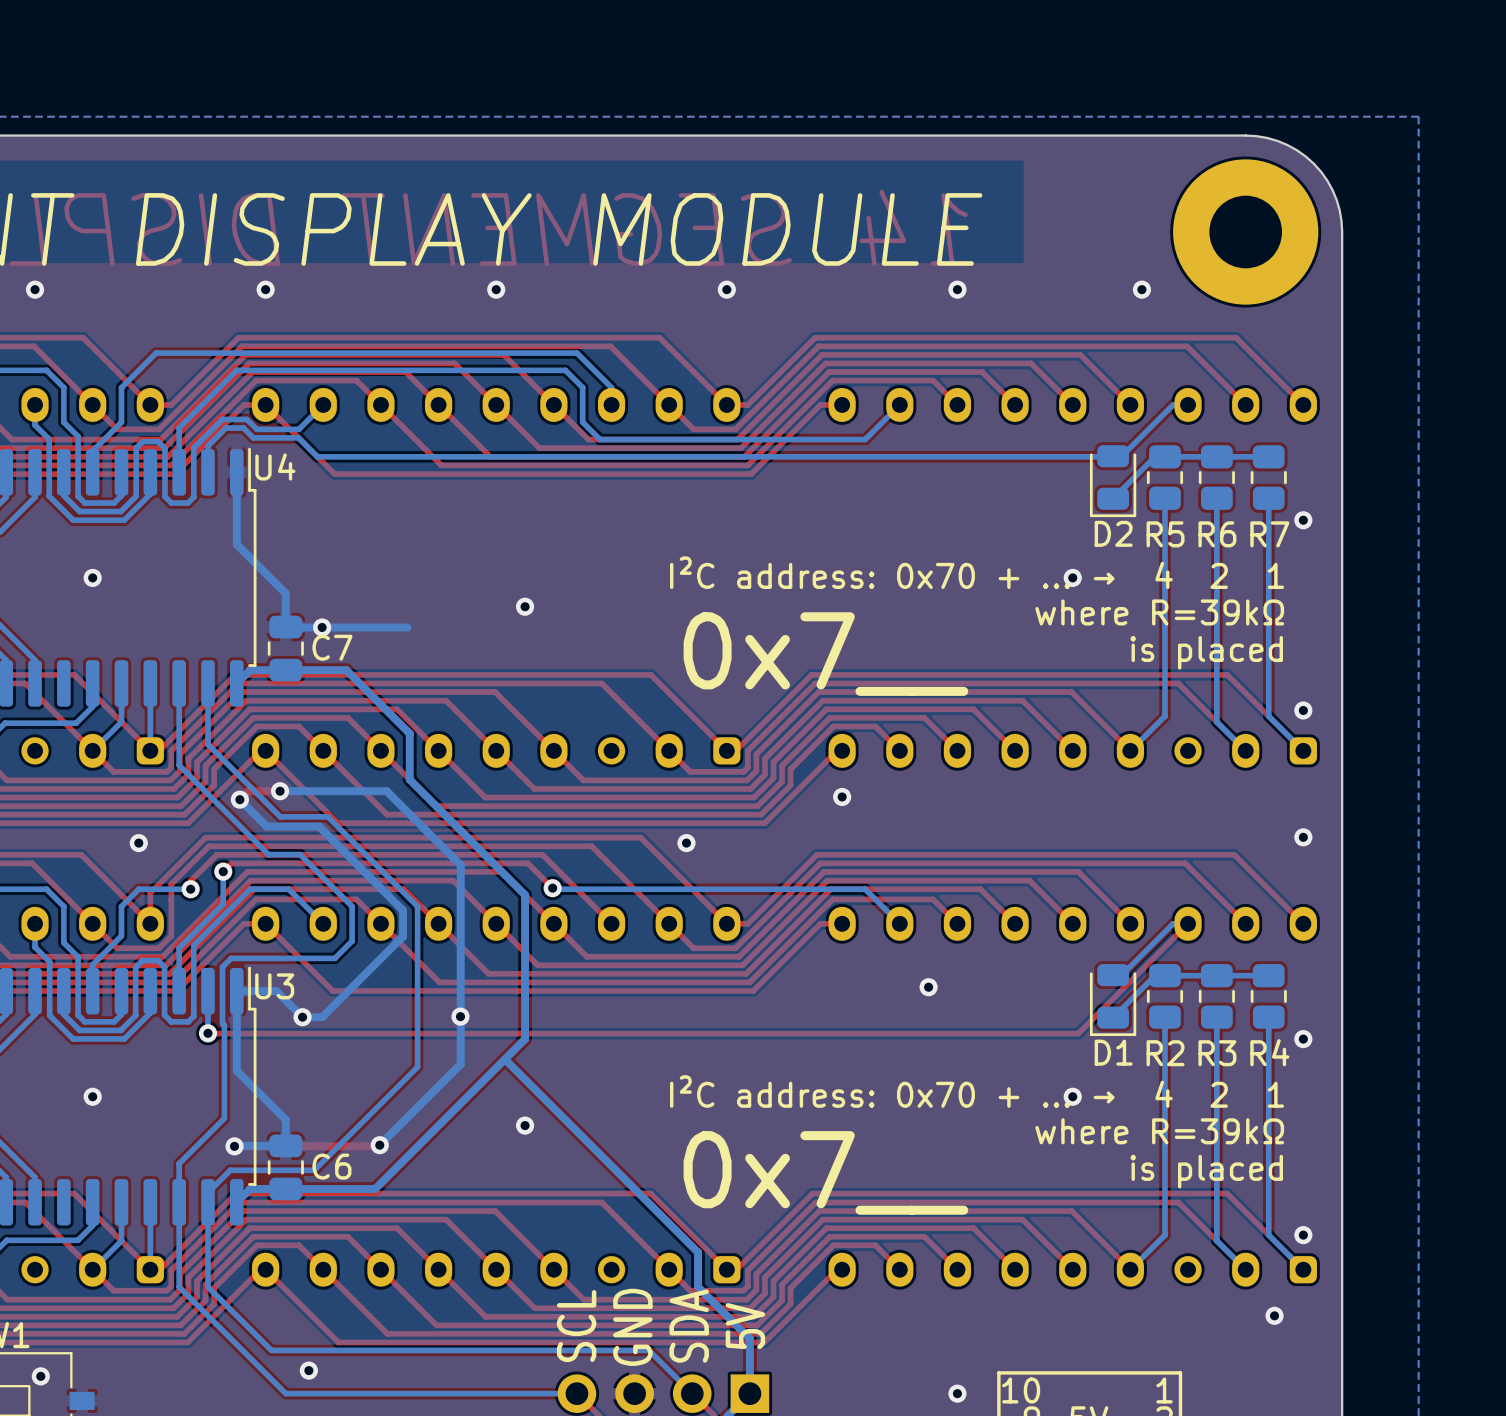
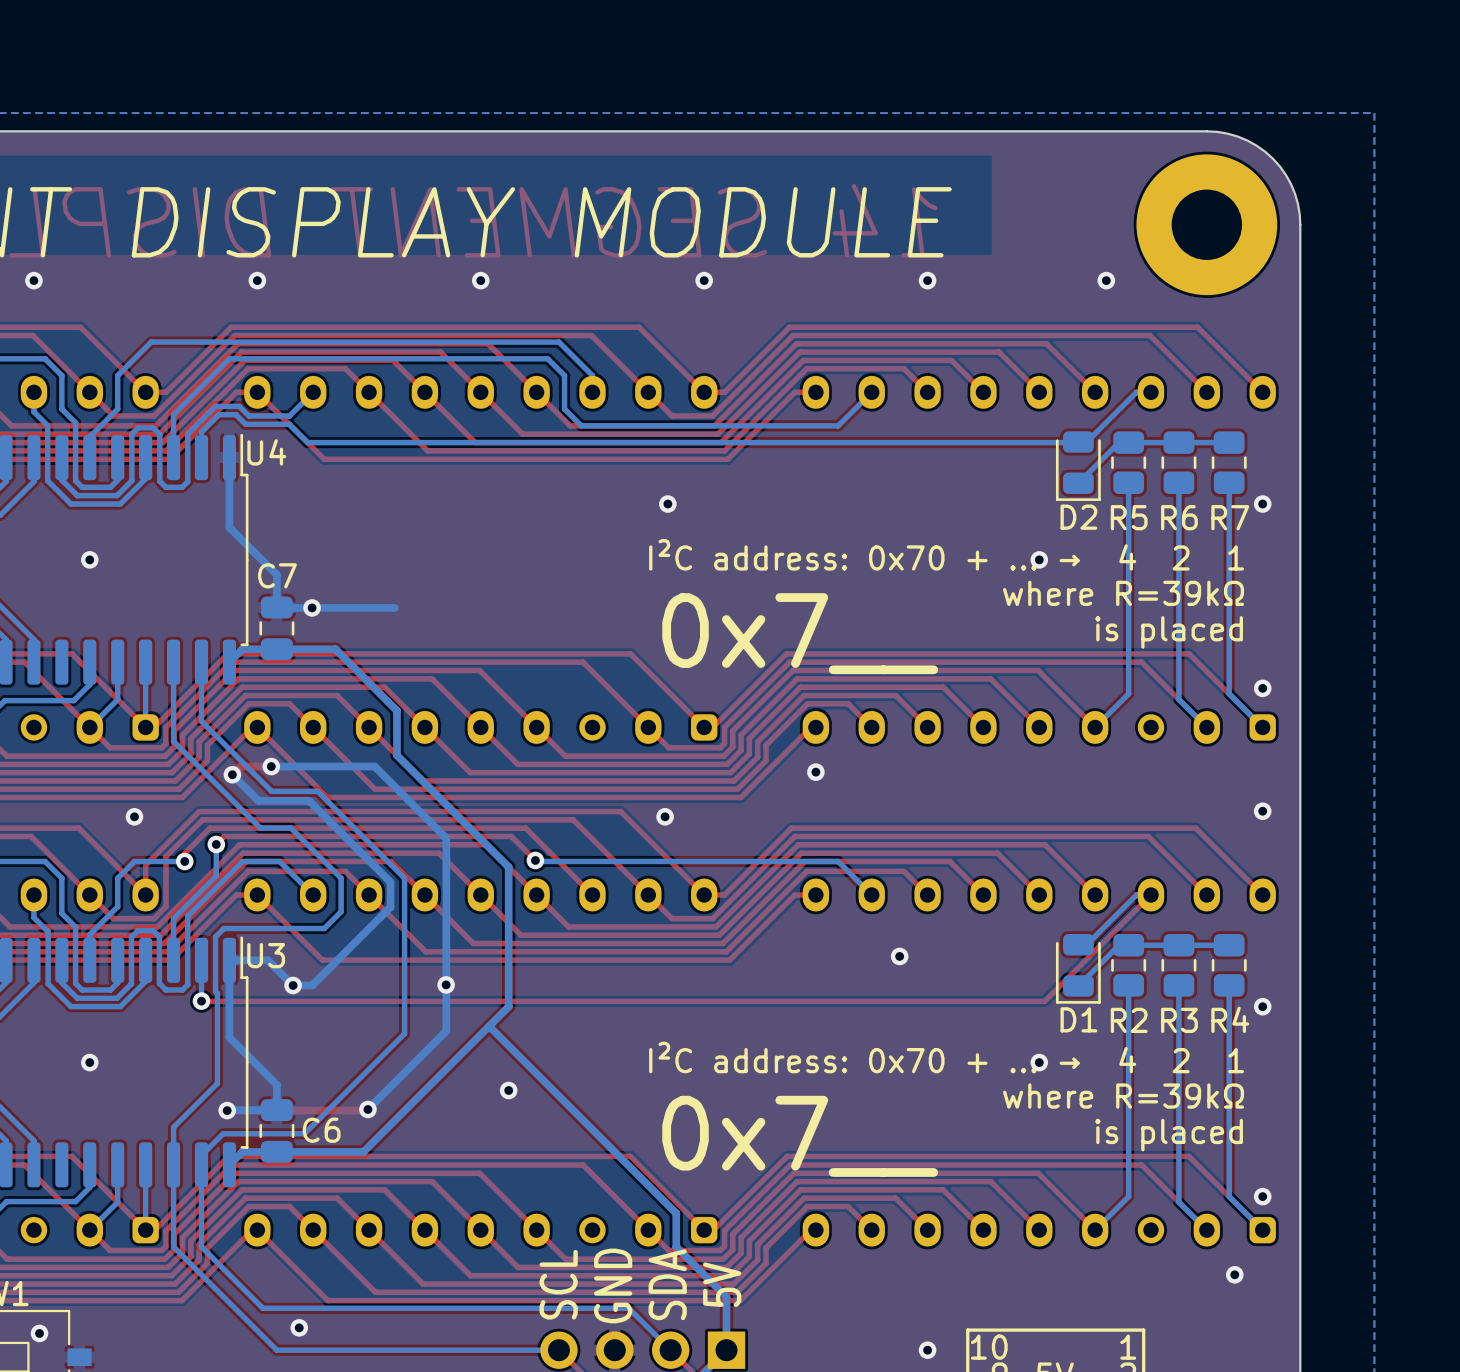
via: none -> (667, 504)
via: (525, 606) -> none
C7 name position: C7 (332, 647) -> C7 (277, 575)

